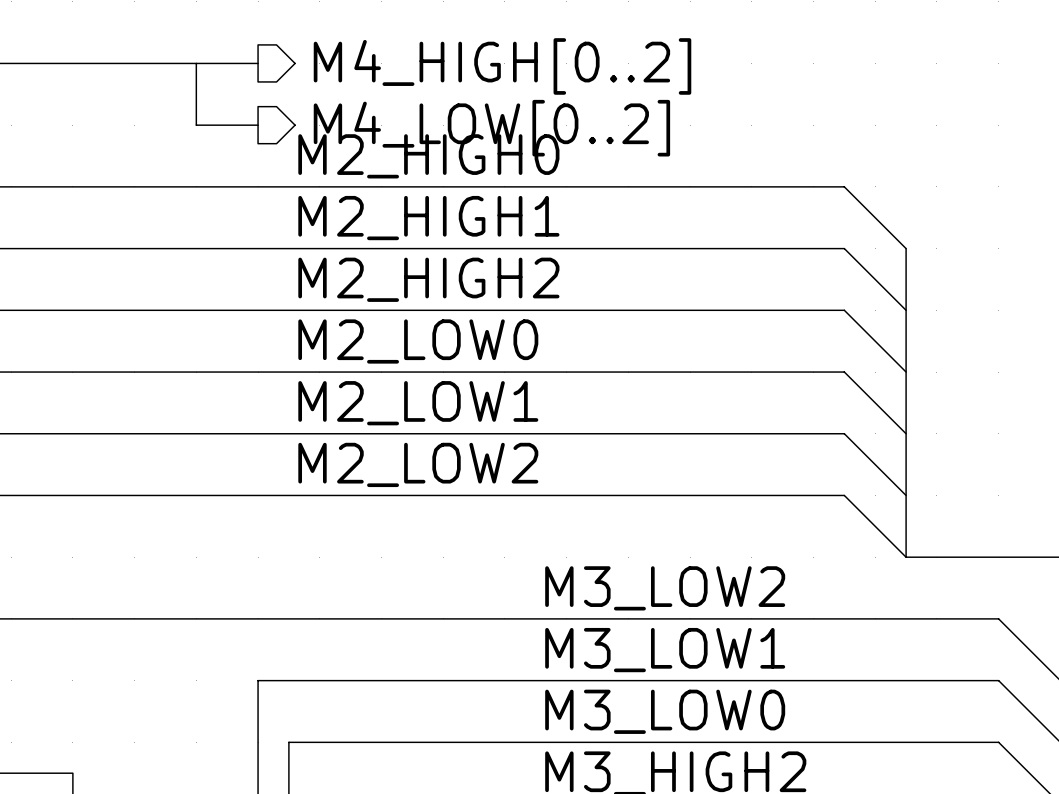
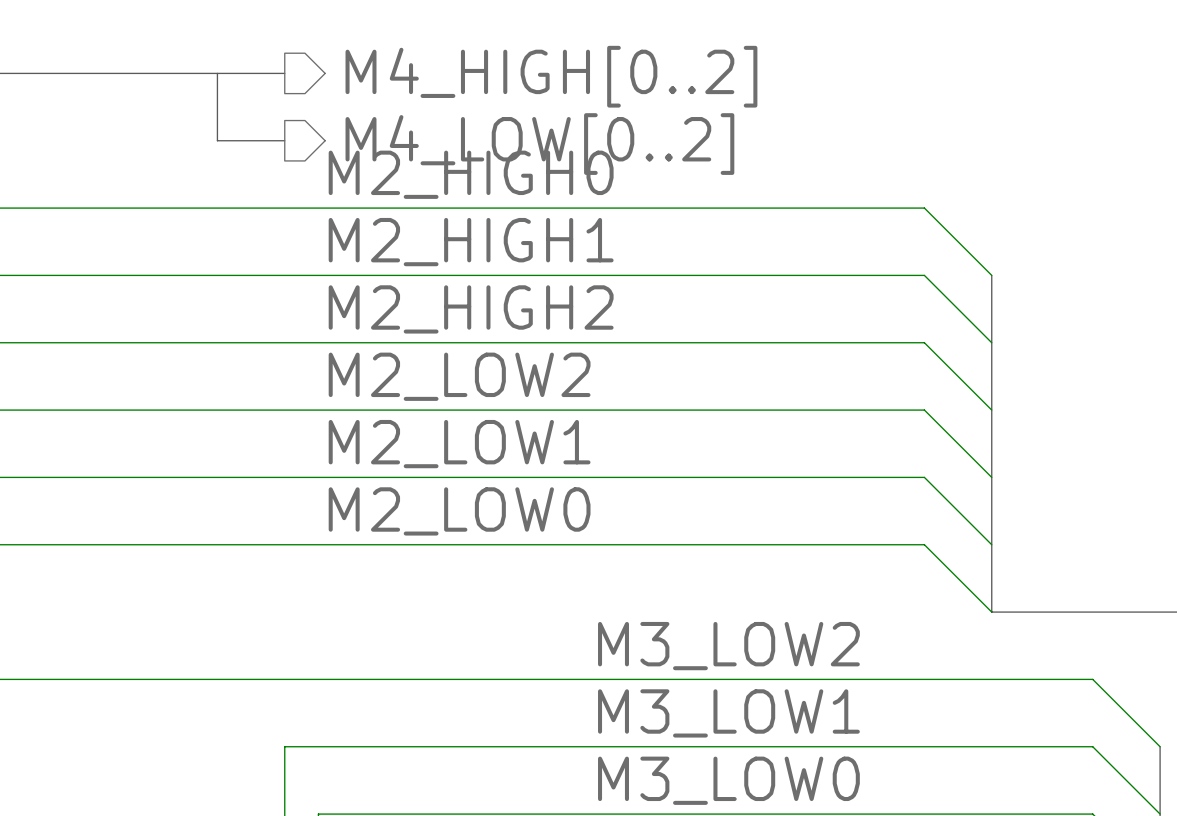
label: M2_LOW0 (418, 341) -> M2_LOW2 (459, 376)
label: M2_LOW2 (418, 464) -> M2_LOW0 (459, 511)

